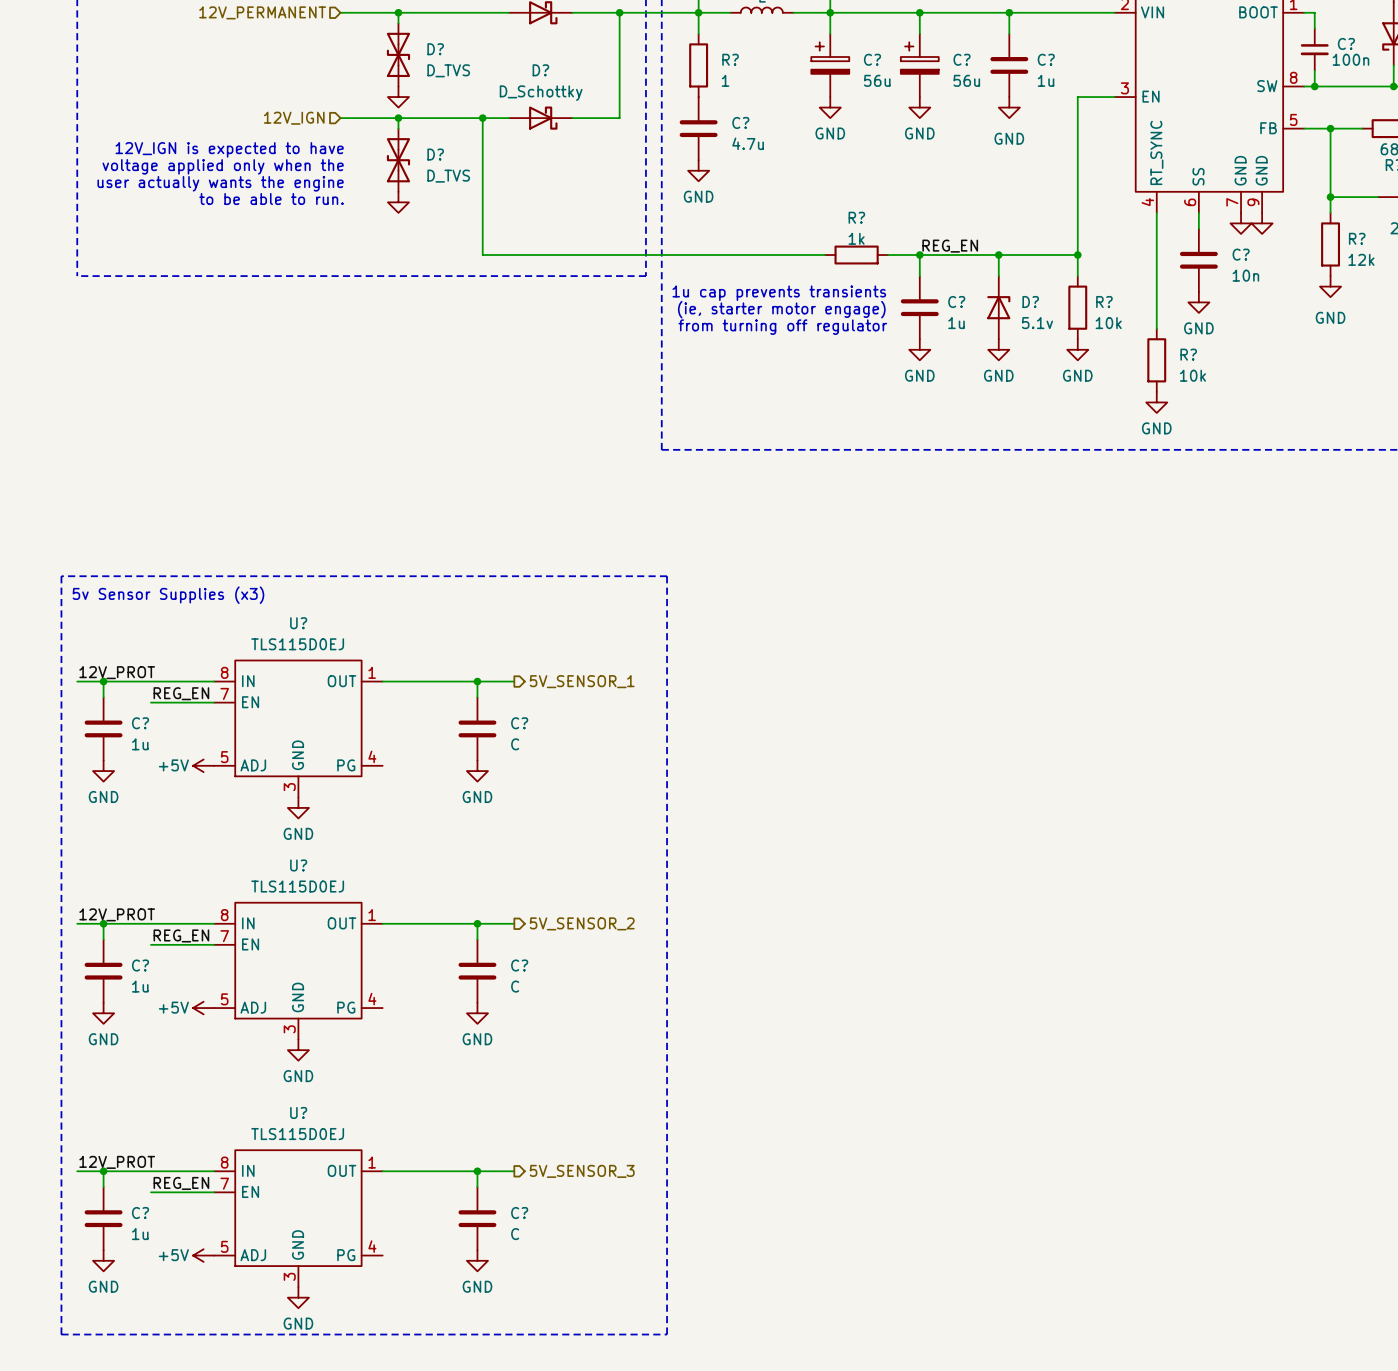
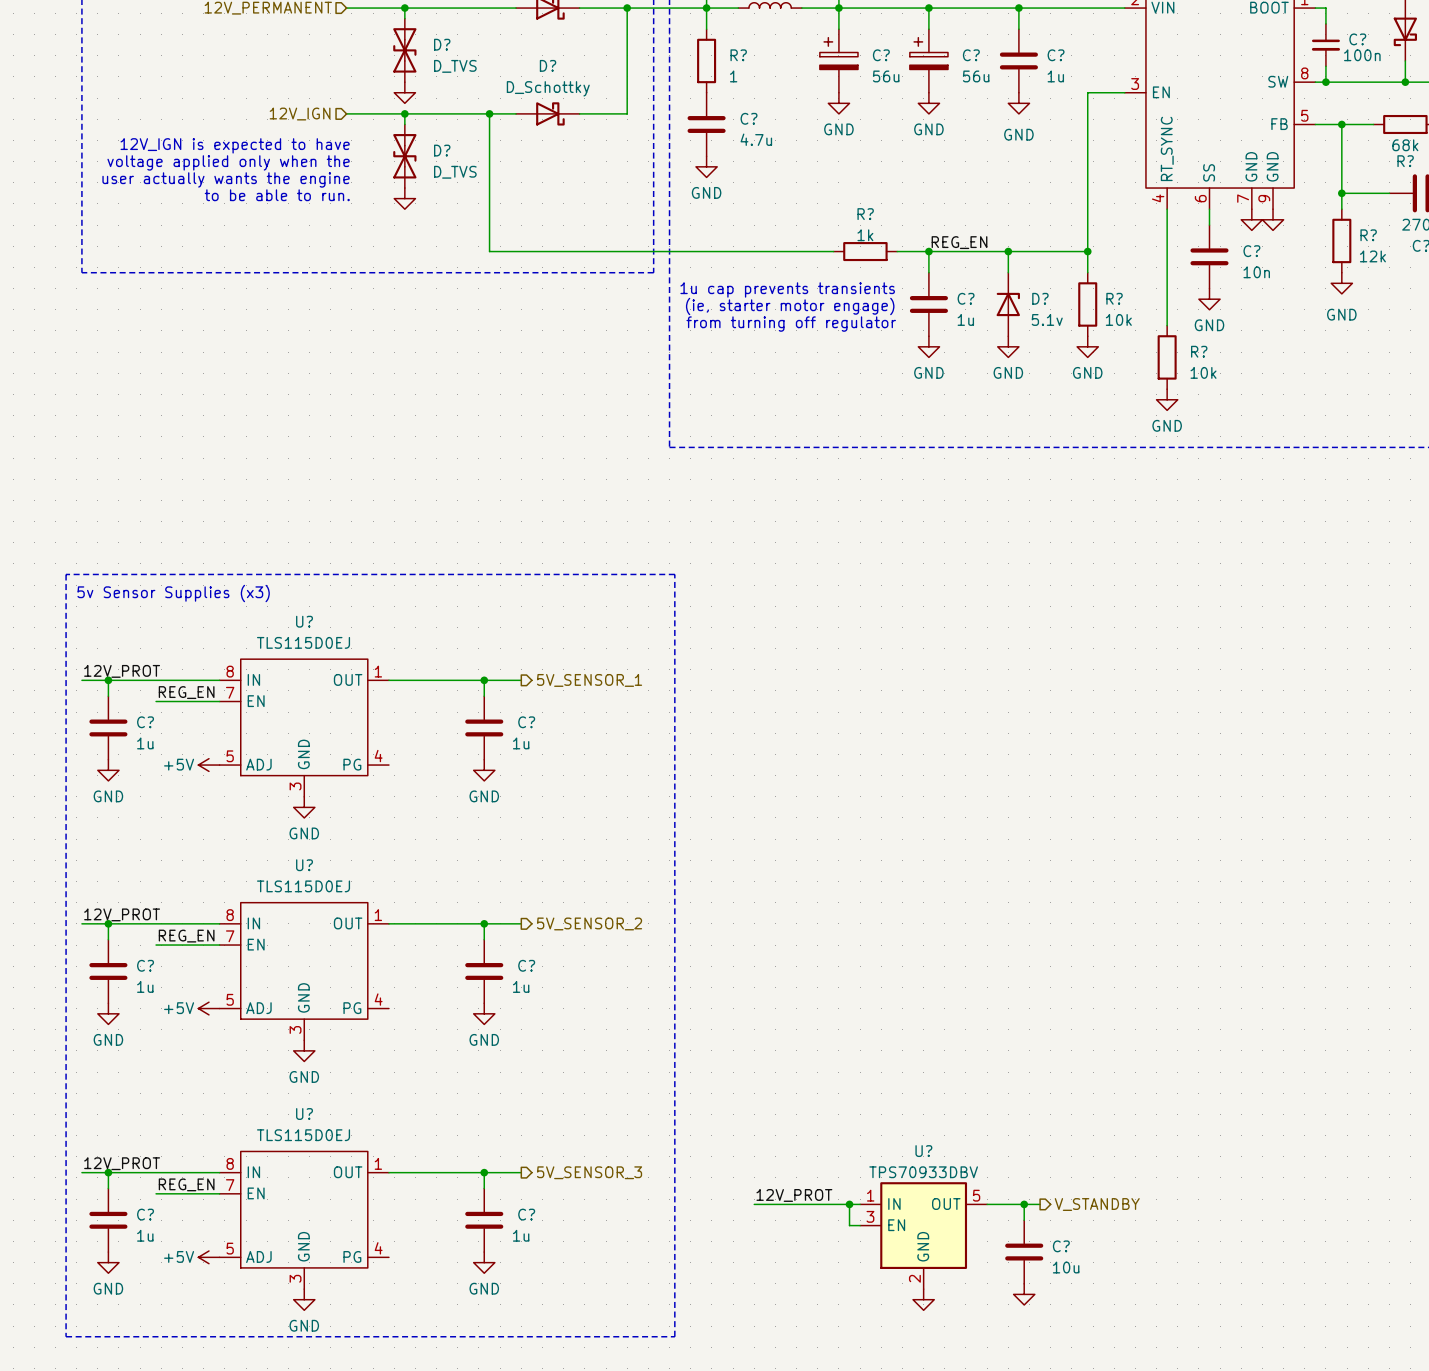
C? value: C (515, 744) -> 1u (521, 743)
C? value: C (515, 986) -> 1u (521, 986)
label: none -> 12V_PROT (794, 1195)
wire: none -> (754, 1204) (860, 1204)
wire: none -> (849, 1204) (849, 1225) (860, 1225)
junction: none -> (849, 1204)
wire: none -> (987, 1204) (1040, 1204)
wire: none -> (1024, 1204) (1024, 1220)
junction: none -> (1024, 1204)
hierarchical label: none -> V_STANDBY (1097, 1204)
U?: none -> TPS70933DBV (923, 1235)
C? value: C (515, 1234) -> 1u (521, 1235)
C?: none -> 10u (1024, 1252)
power symbol: none -> (1024, 1294)
power symbol: none -> (923, 1299)

